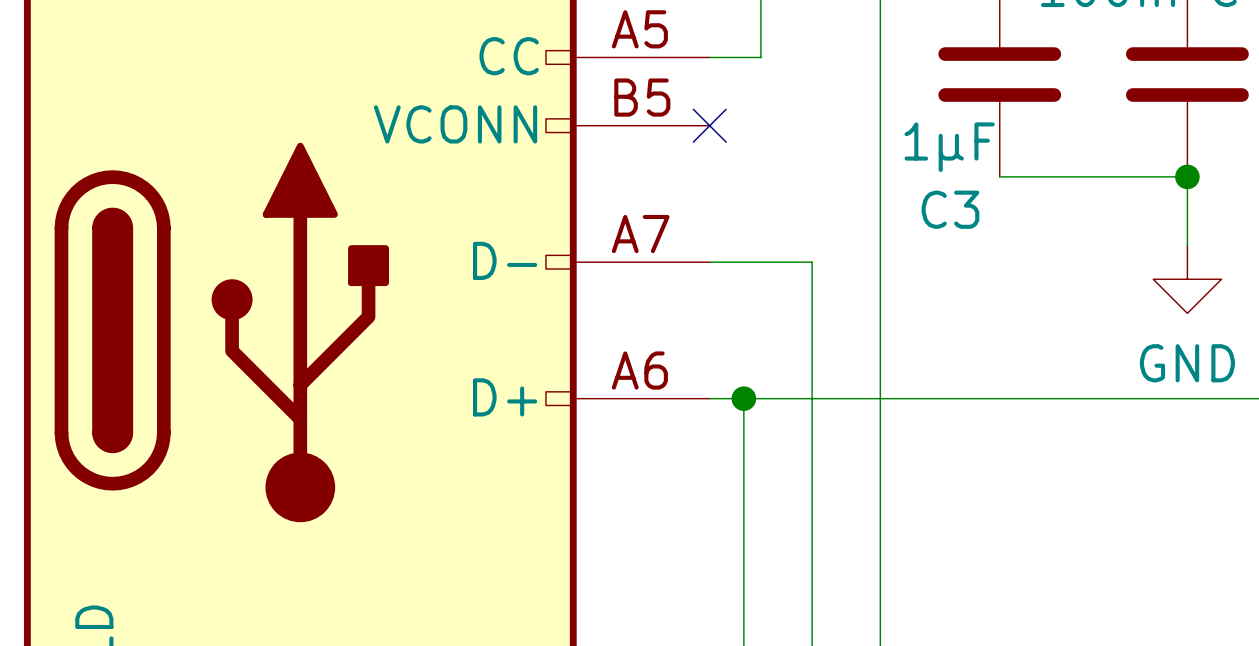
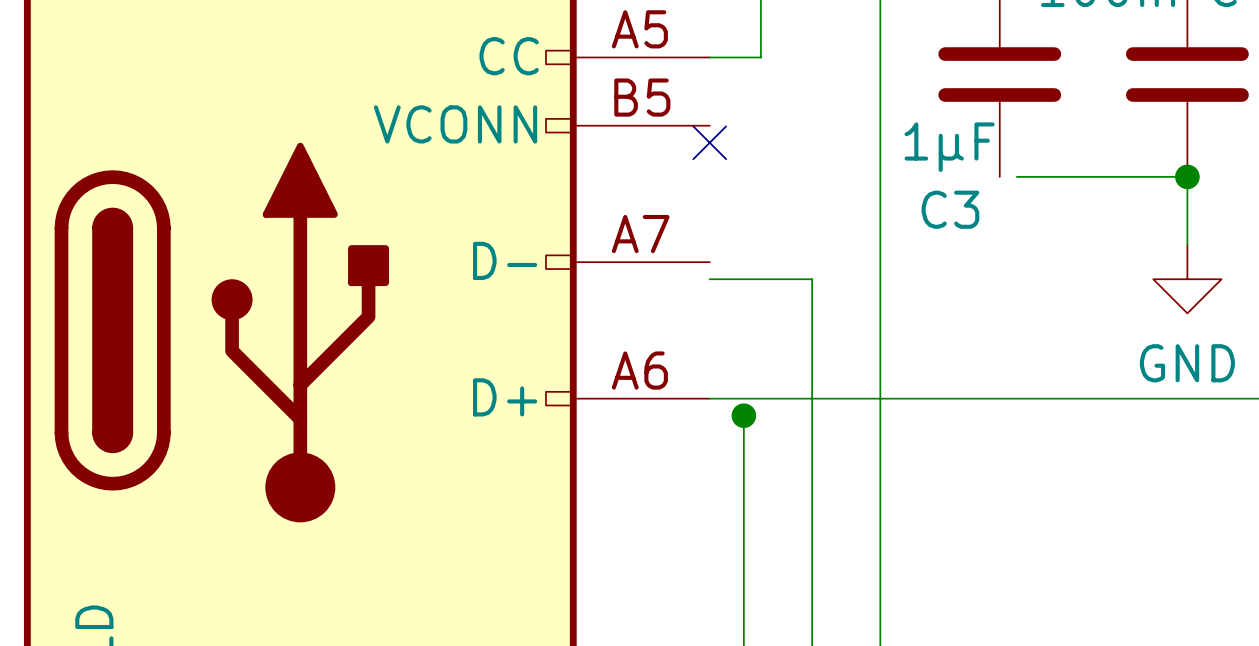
no-connect mark position: (709, 125) -> (709, 142)
wire: (999, 176) (1016, 176) -> none
wire: (709, 262) (812, 262) (812, 279) -> (709, 279) (812, 279)
junction position: (743, 398) -> (743, 415)

